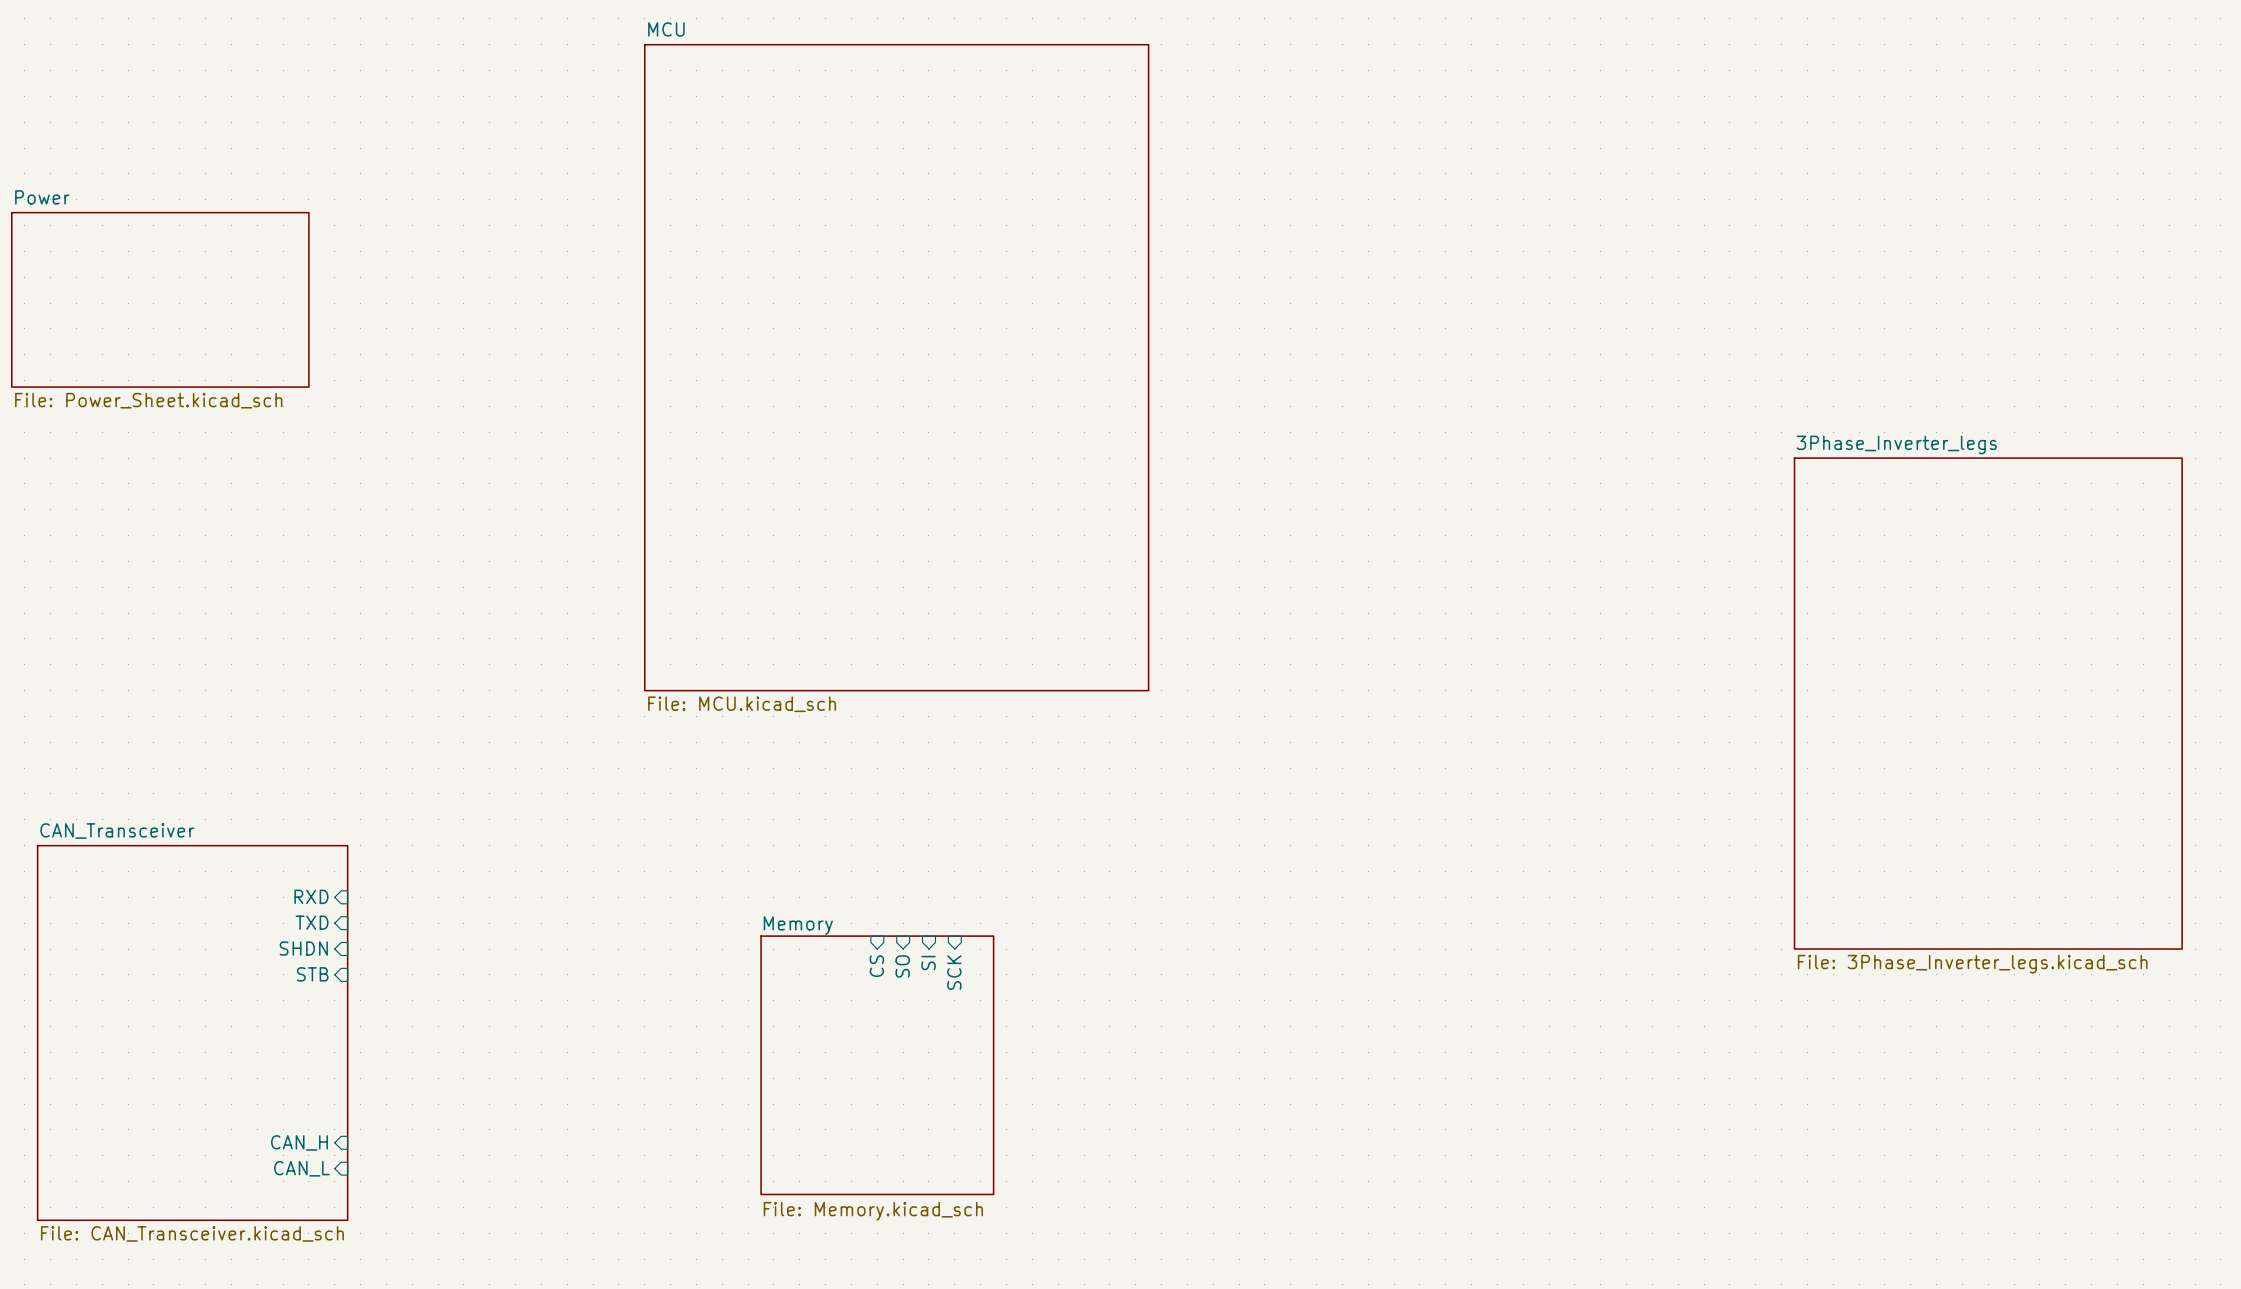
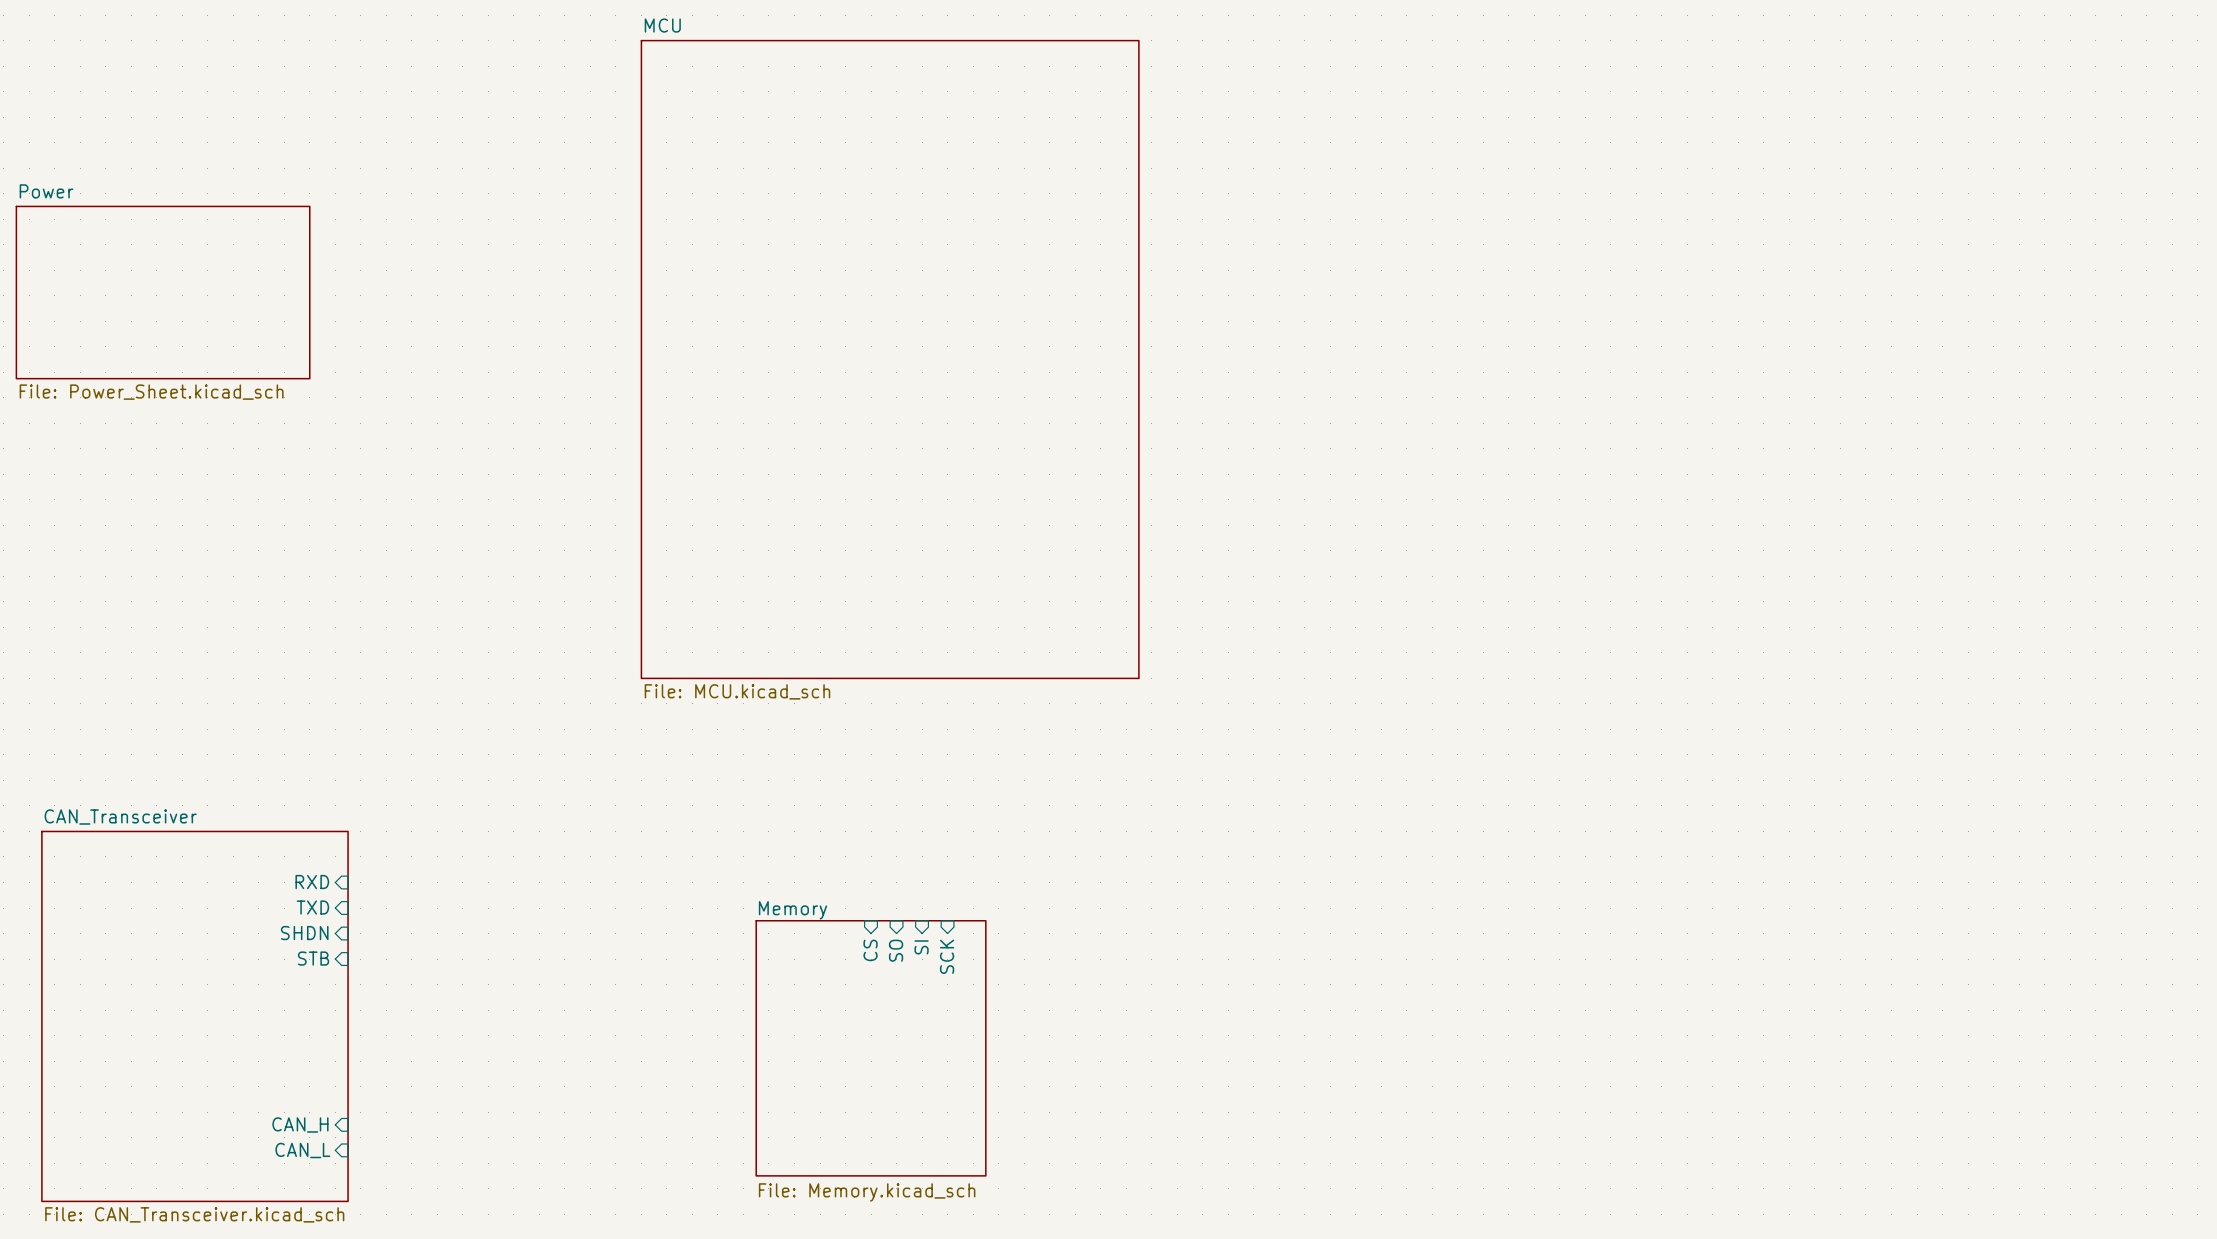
sheet 3Phase_Inverter_legs: File: 3Phase_Inverter_legs.kicad_sch (1988, 703) -> none

